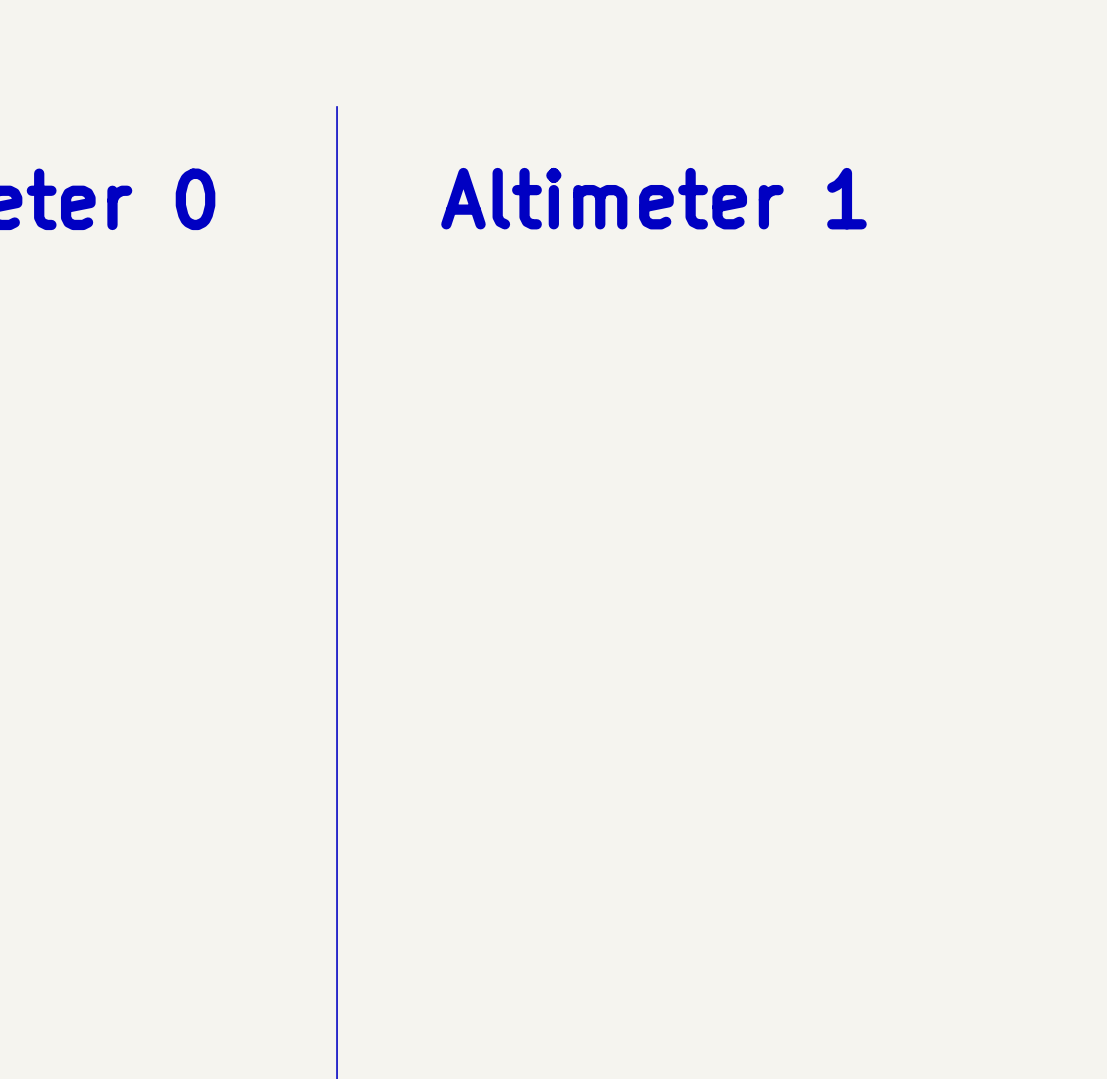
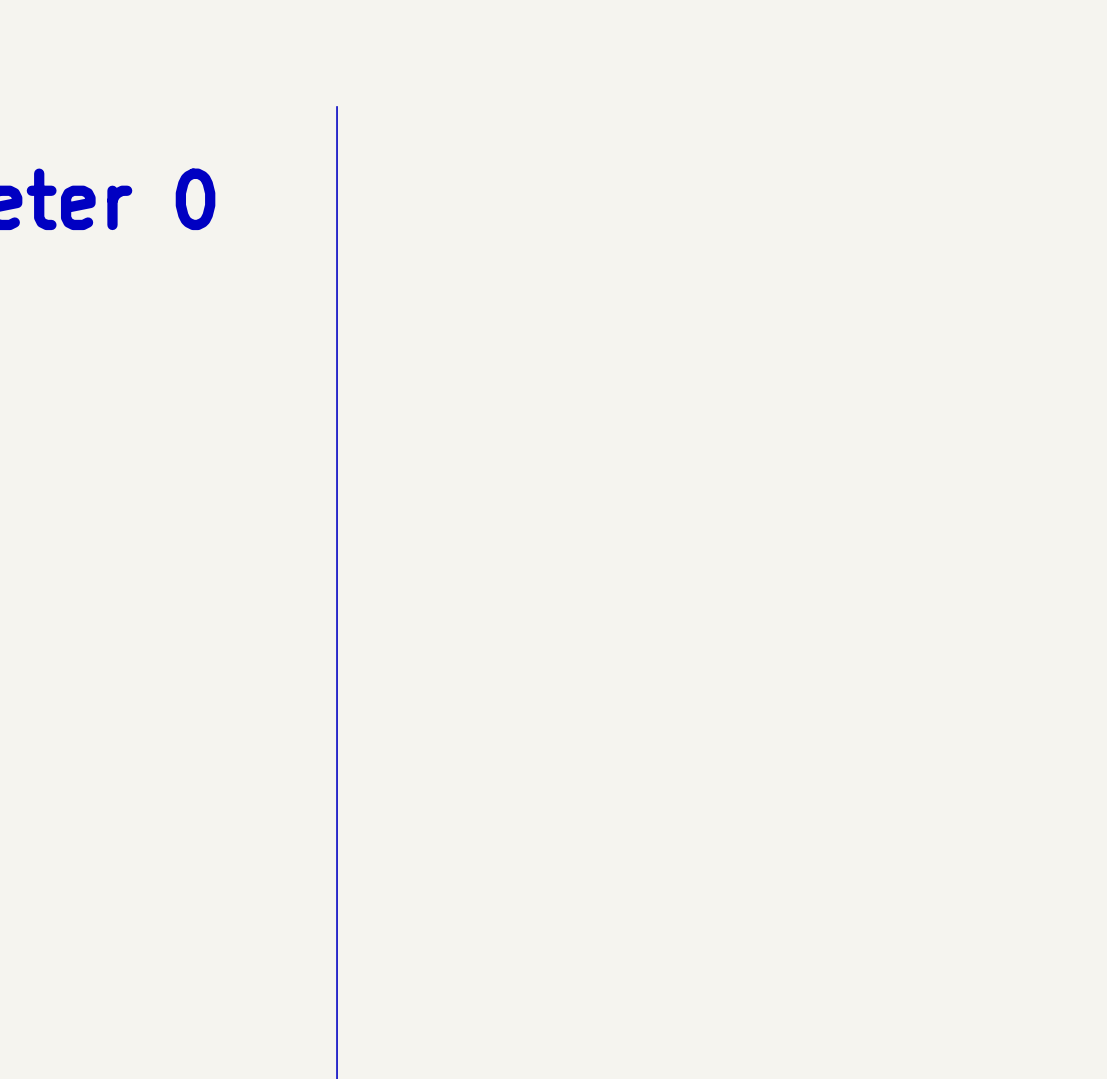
text: Altimeter 1 (653, 198) -> none

